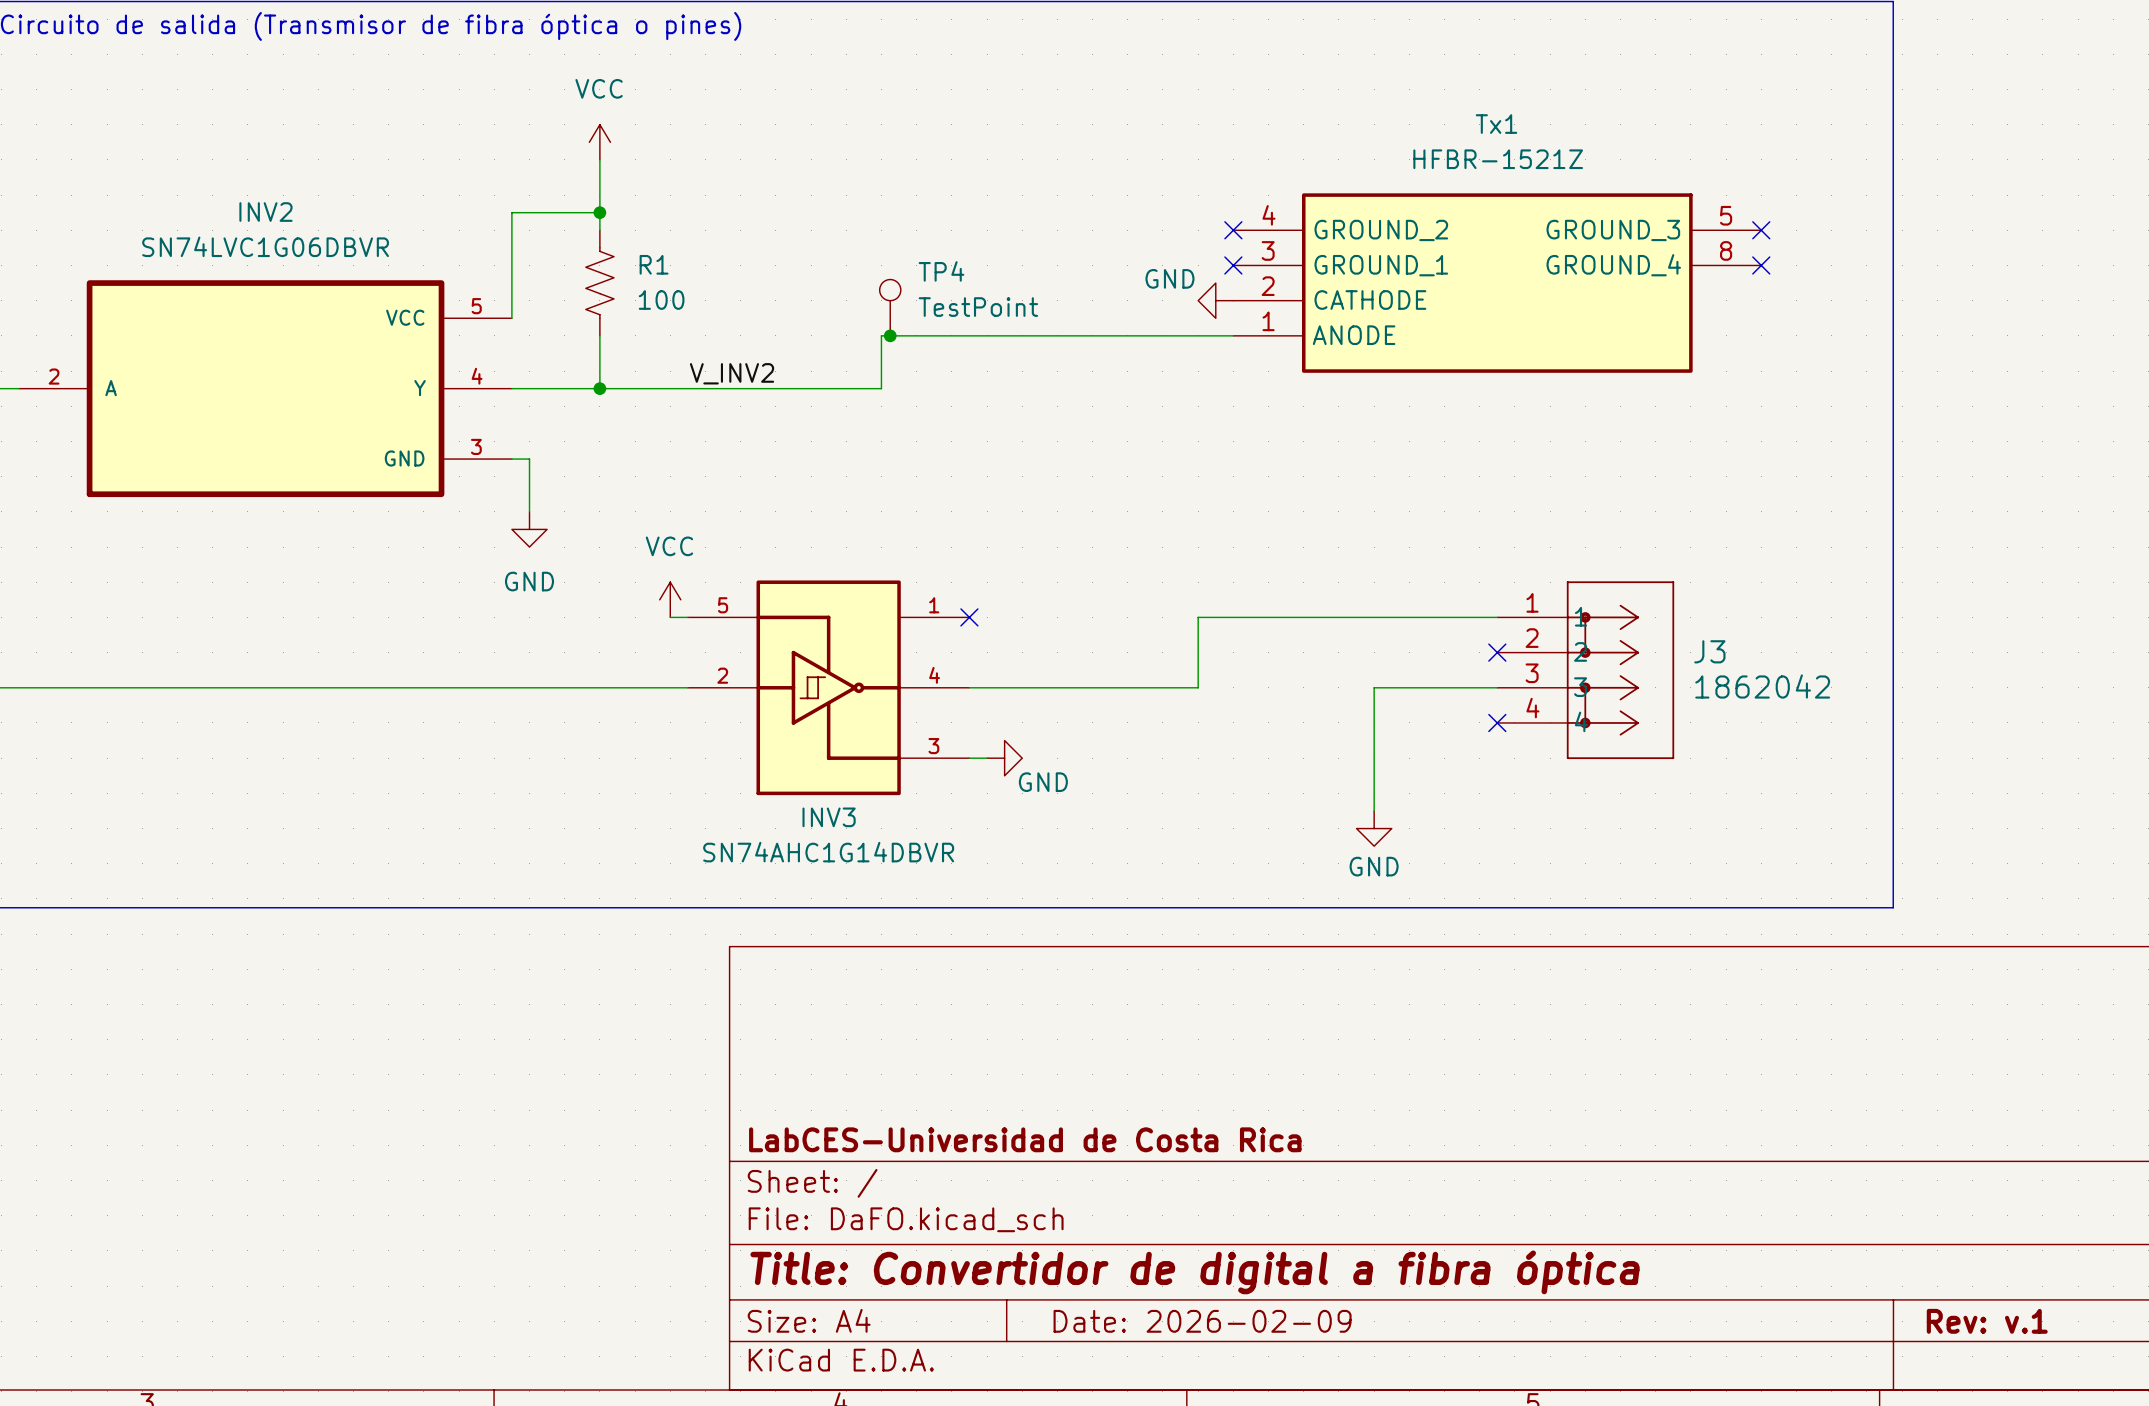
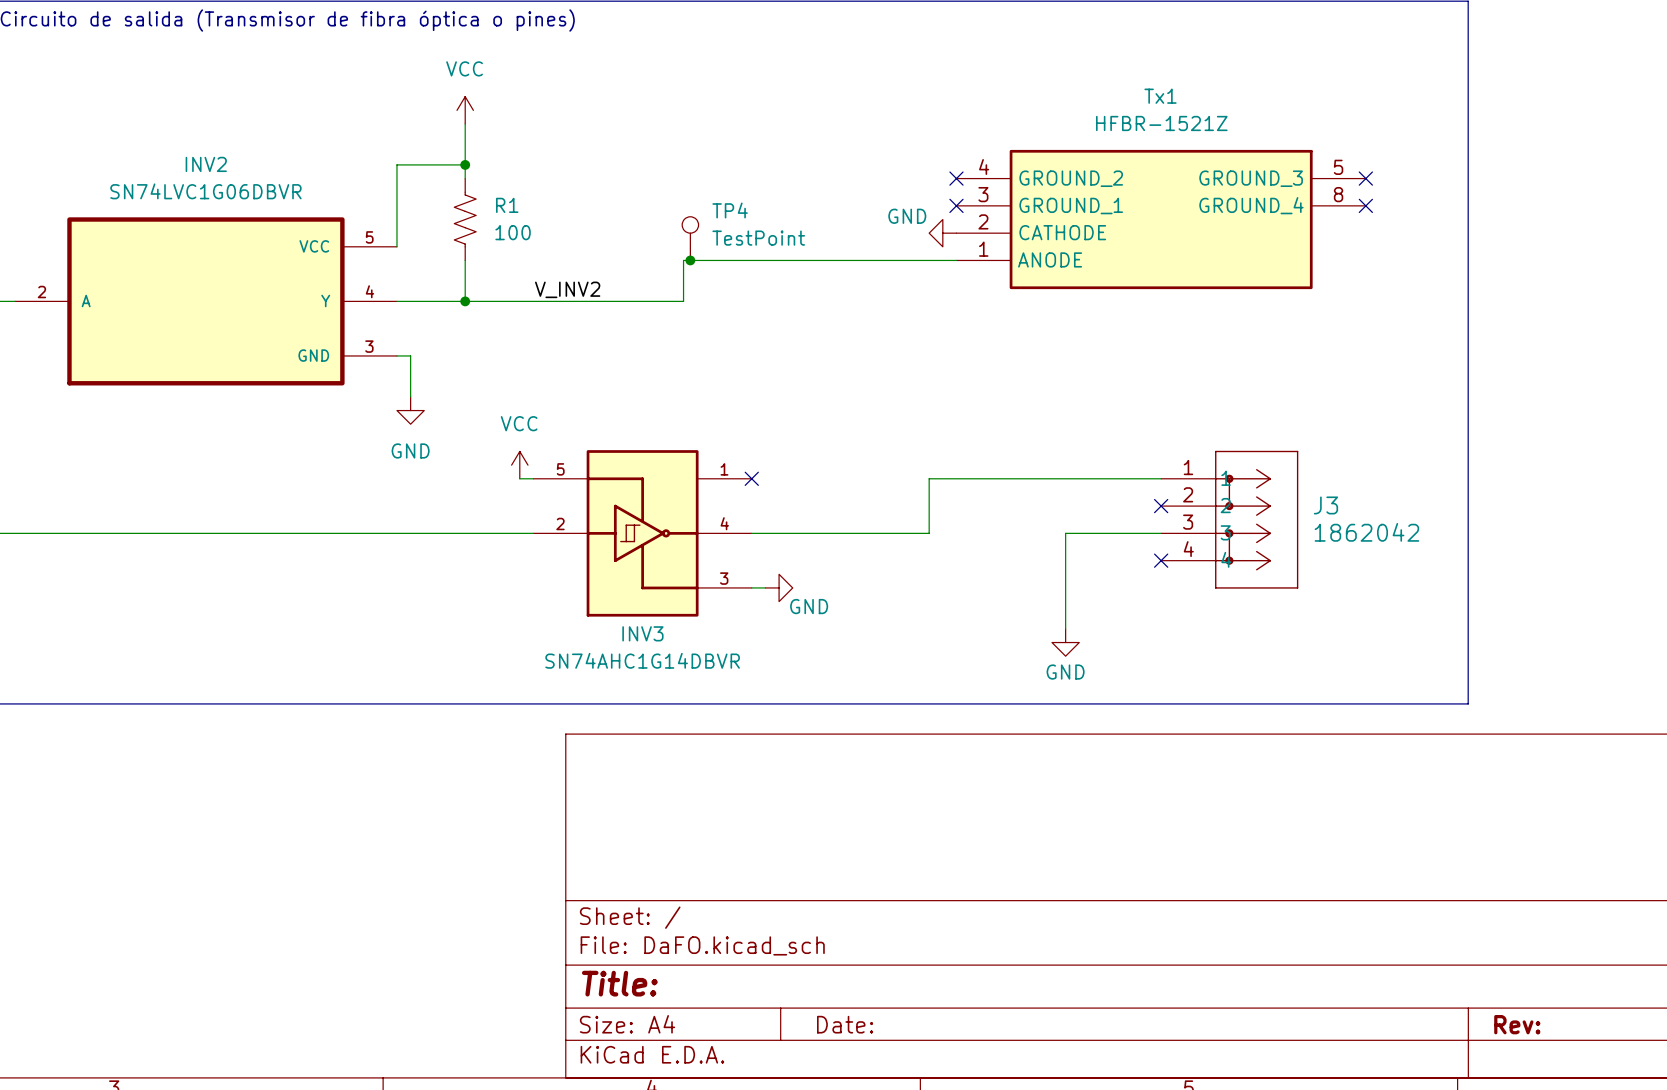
title block: LabCES-Universidad de Costa Rica (1025, 1139) -> none
title block: Title: Convertidor de digital a fibra óptica (1195, 1272) -> Title: (619, 983)
title block: Date: 2026-02-09 (1202, 1321) -> Date: (845, 1024)
title block: Rev: v.1 (1987, 1321) -> Rev: (1517, 1024)

